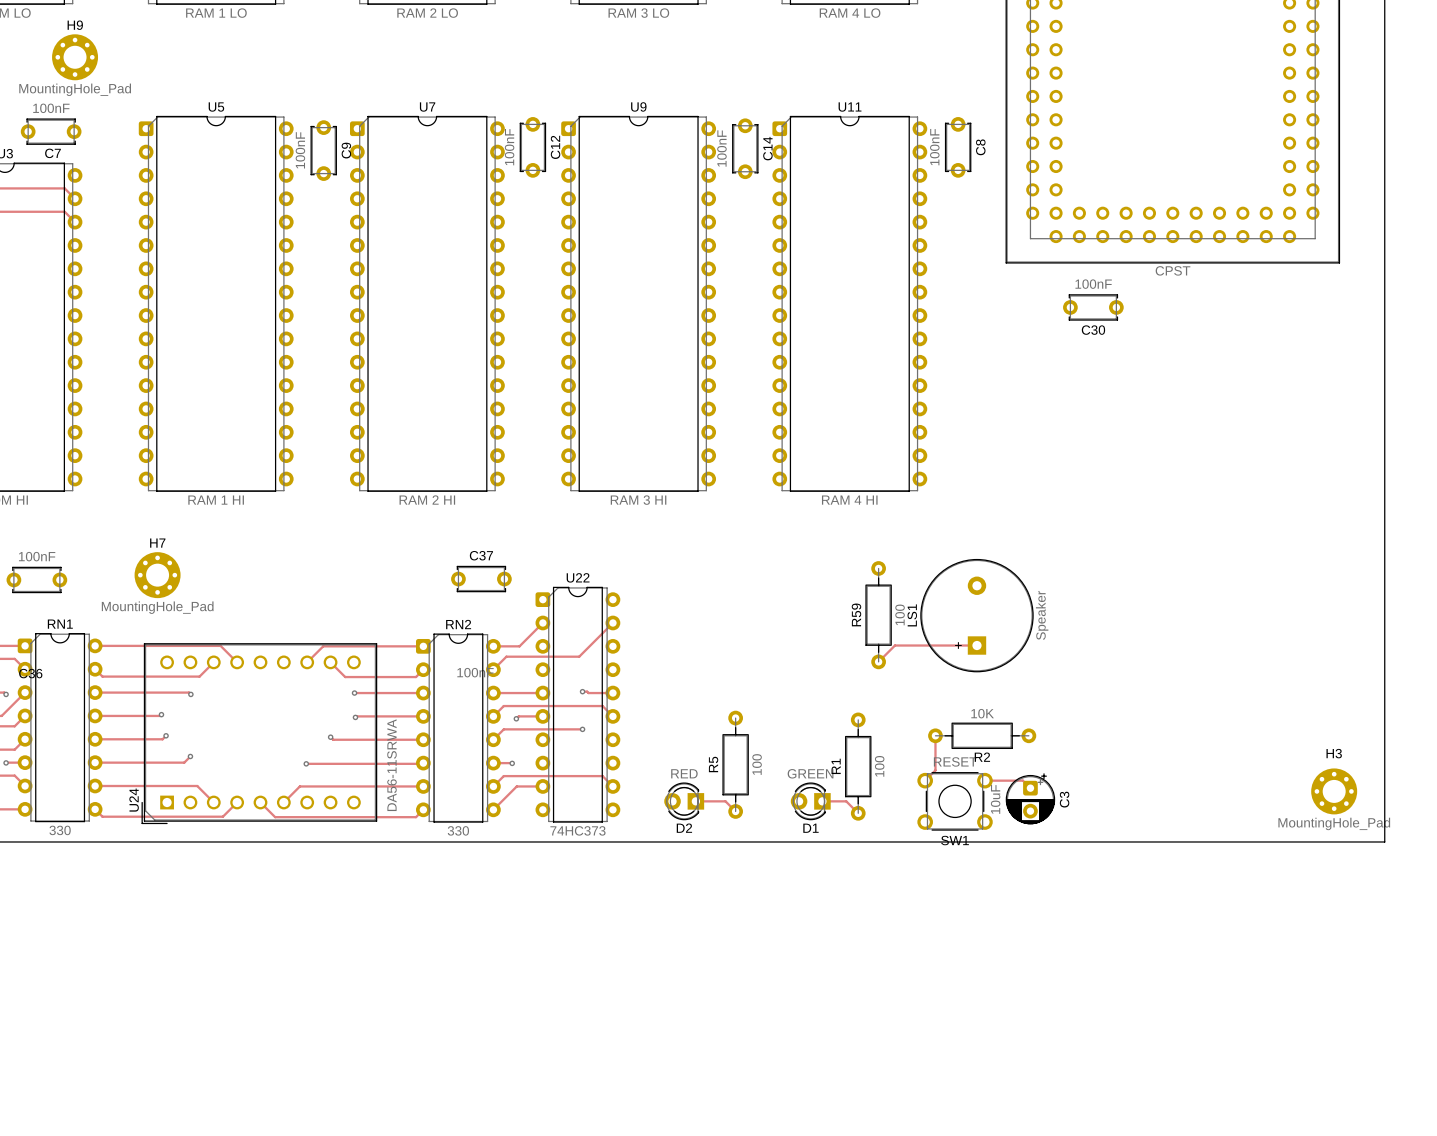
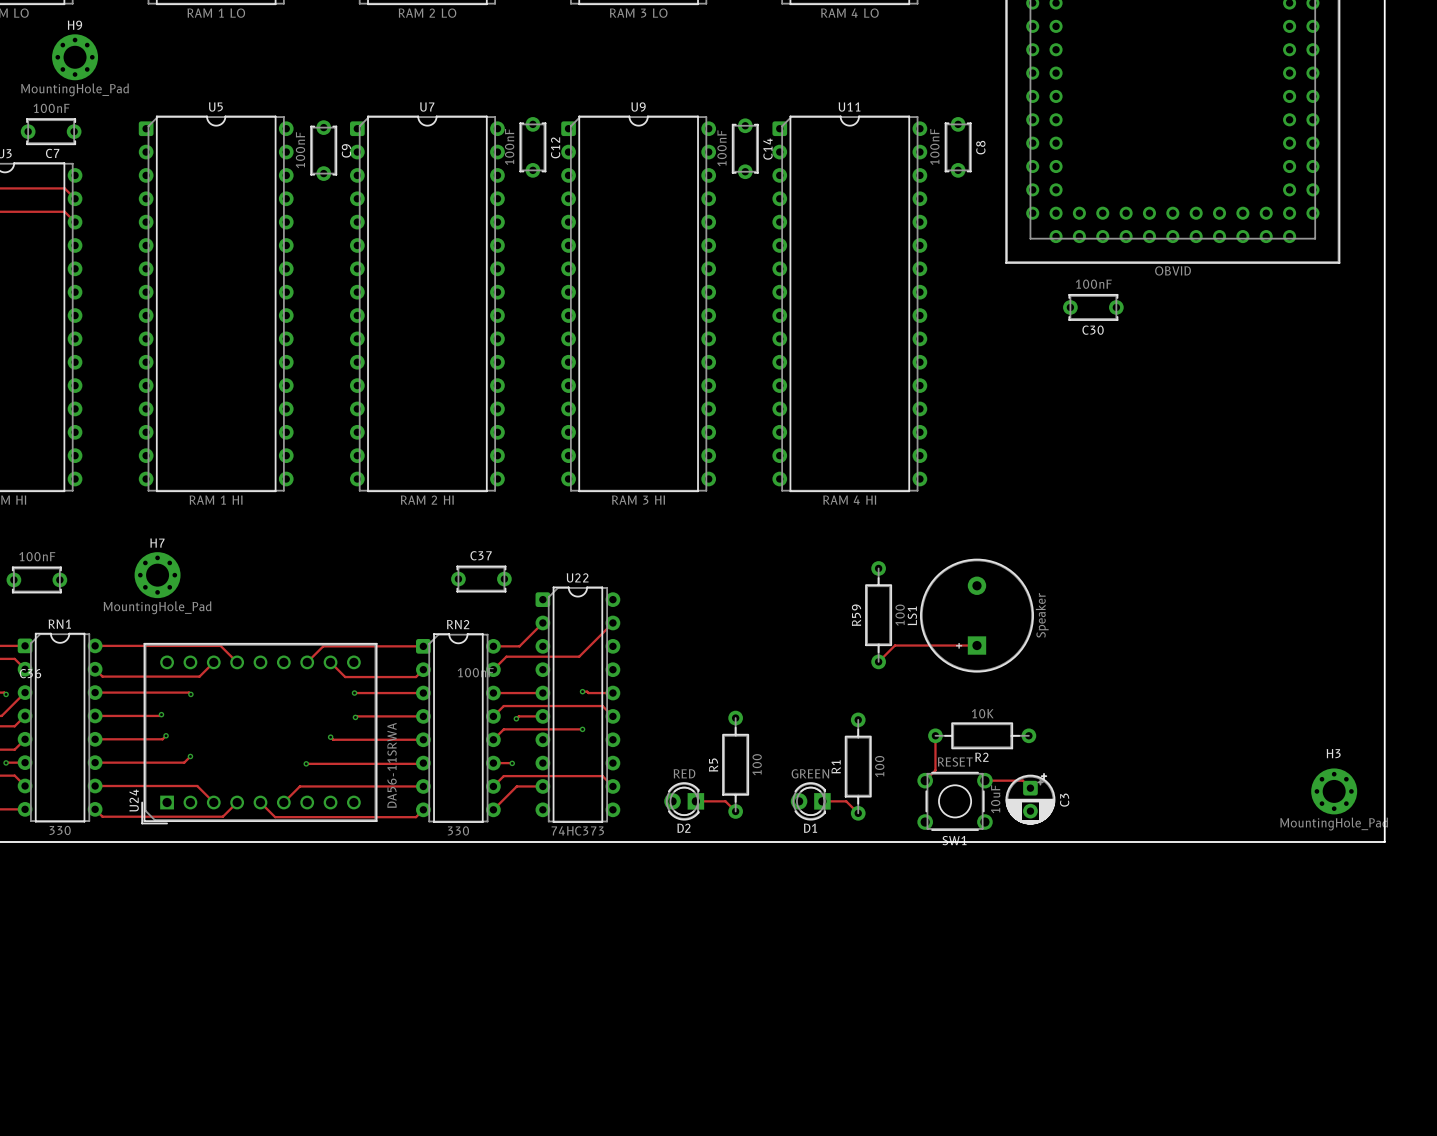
part value: CPST (1173, 270) -> OBVID (1173, 270)

